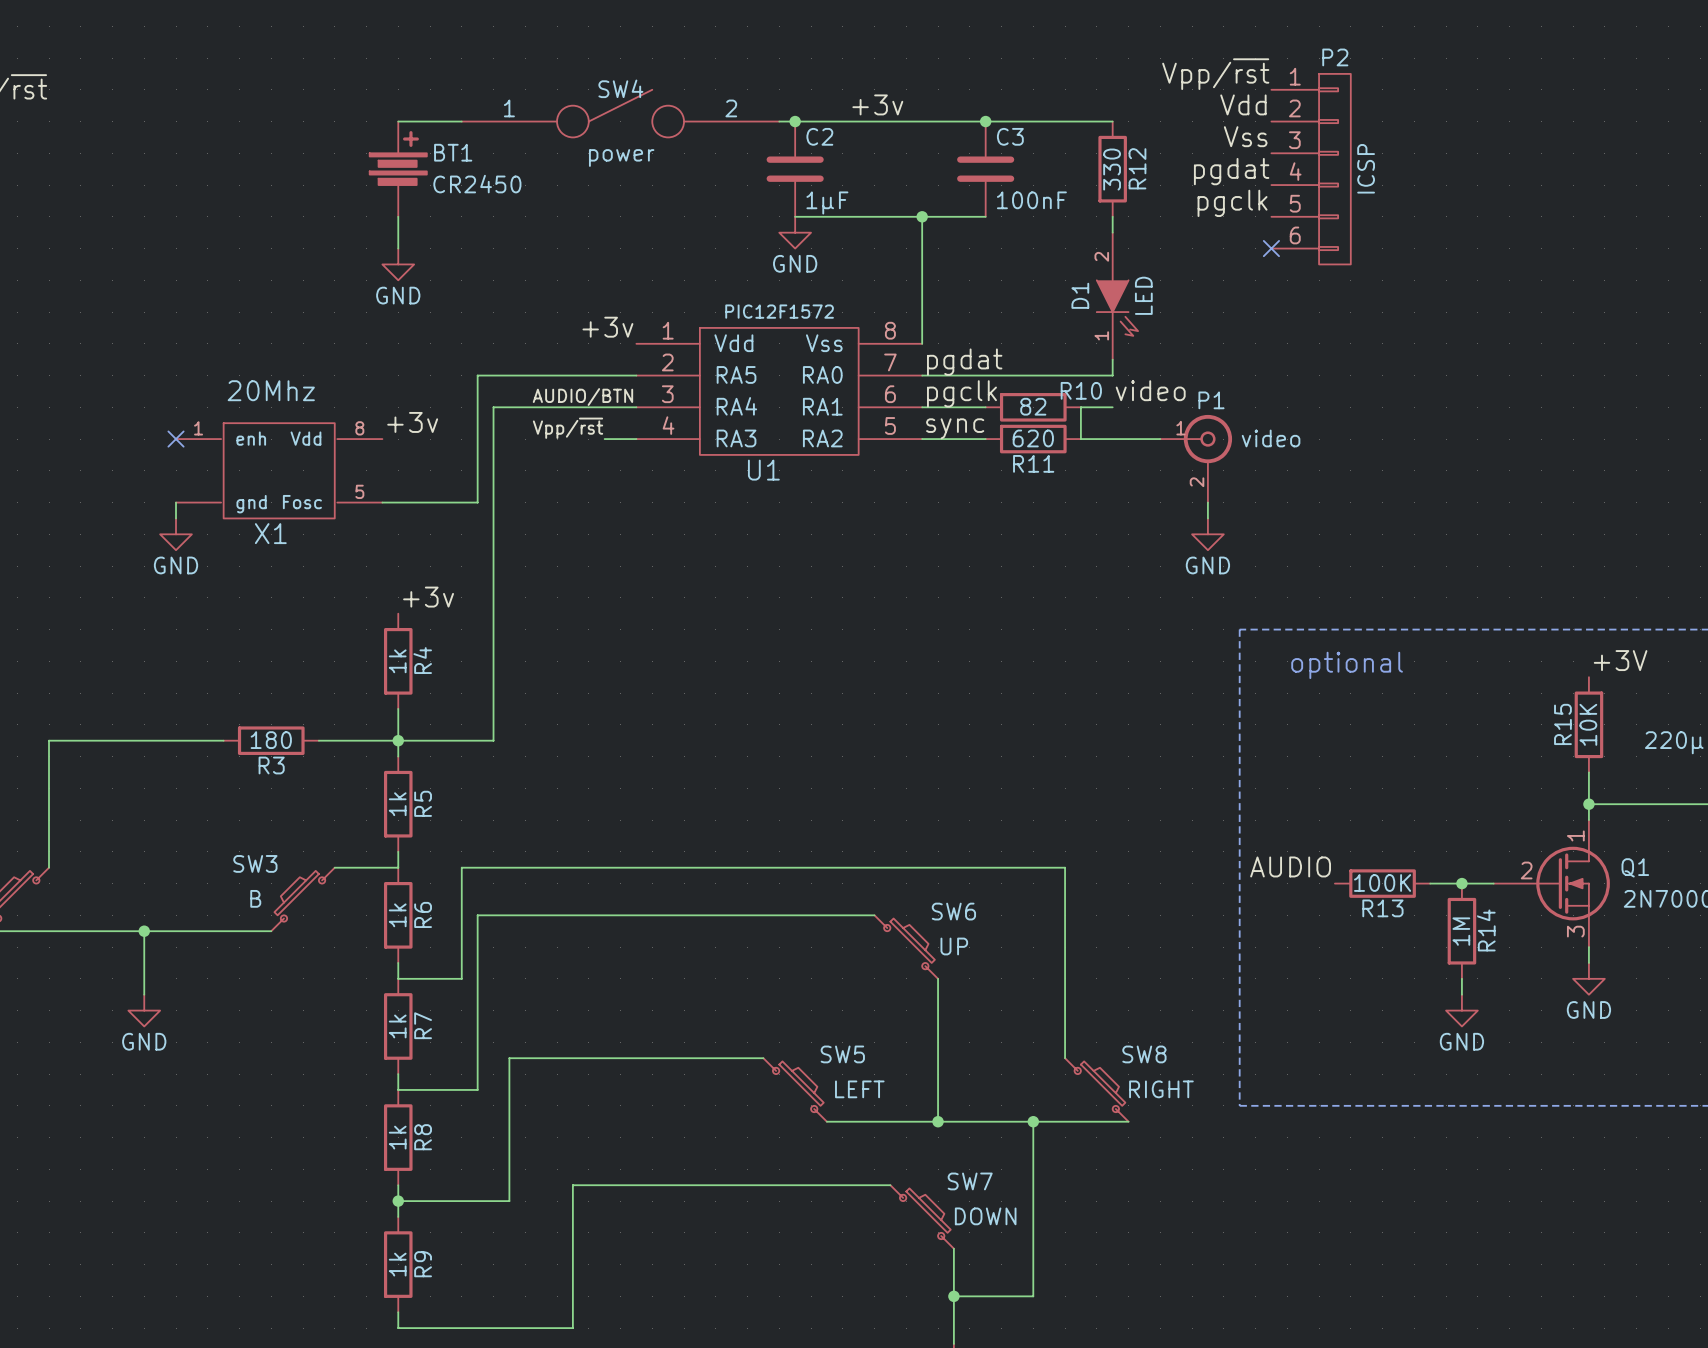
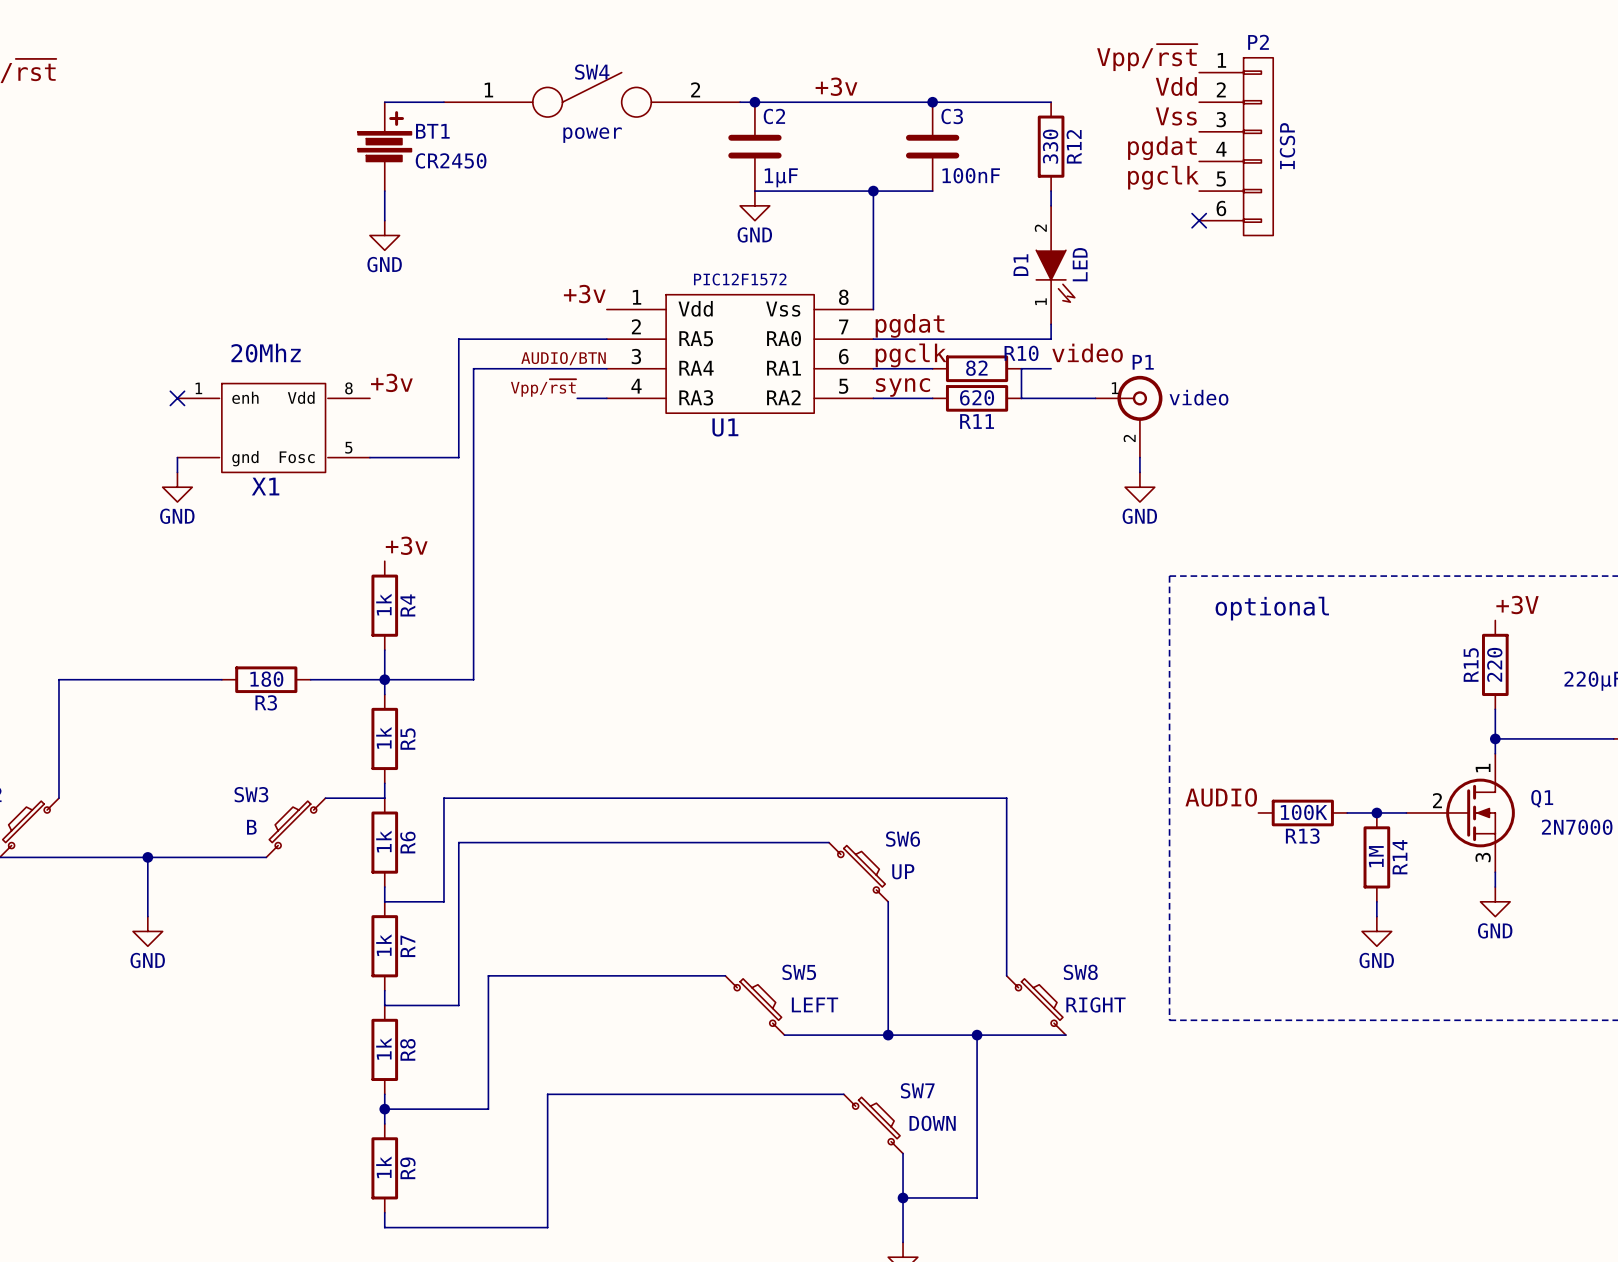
R15 value: 10K (1588, 724) -> 220 (1494, 664)

